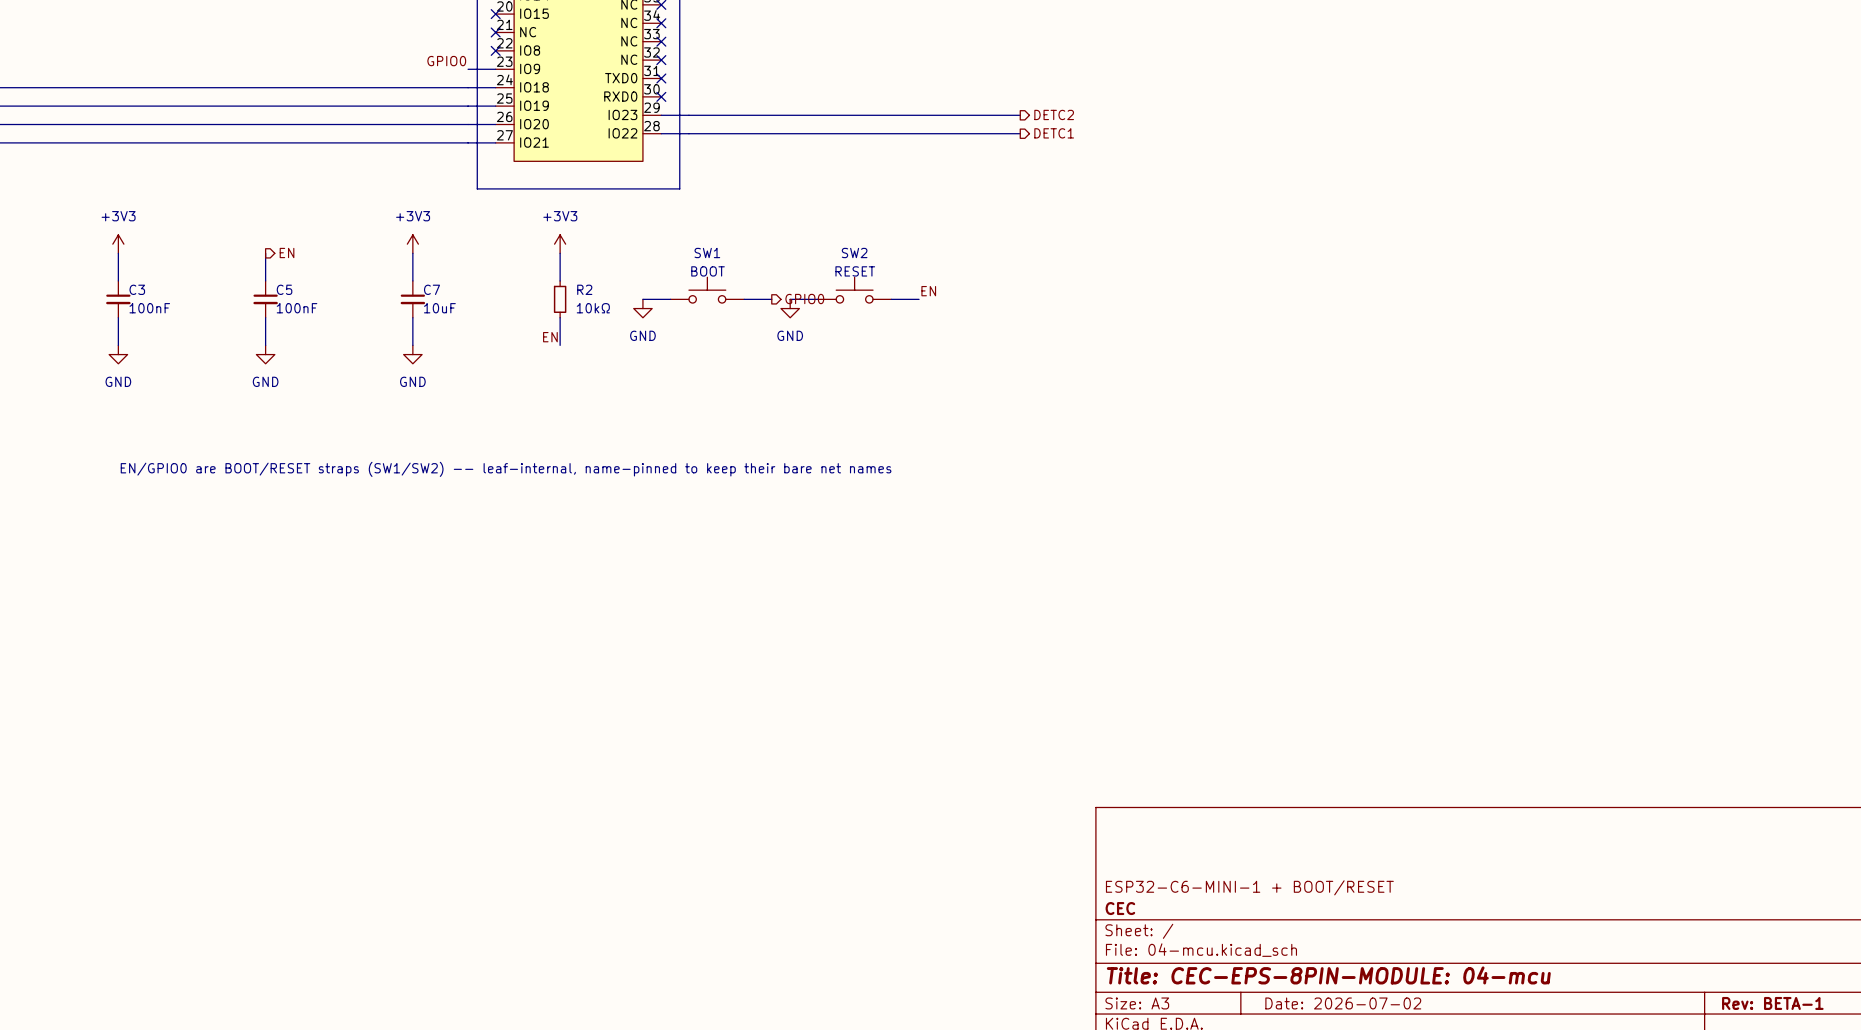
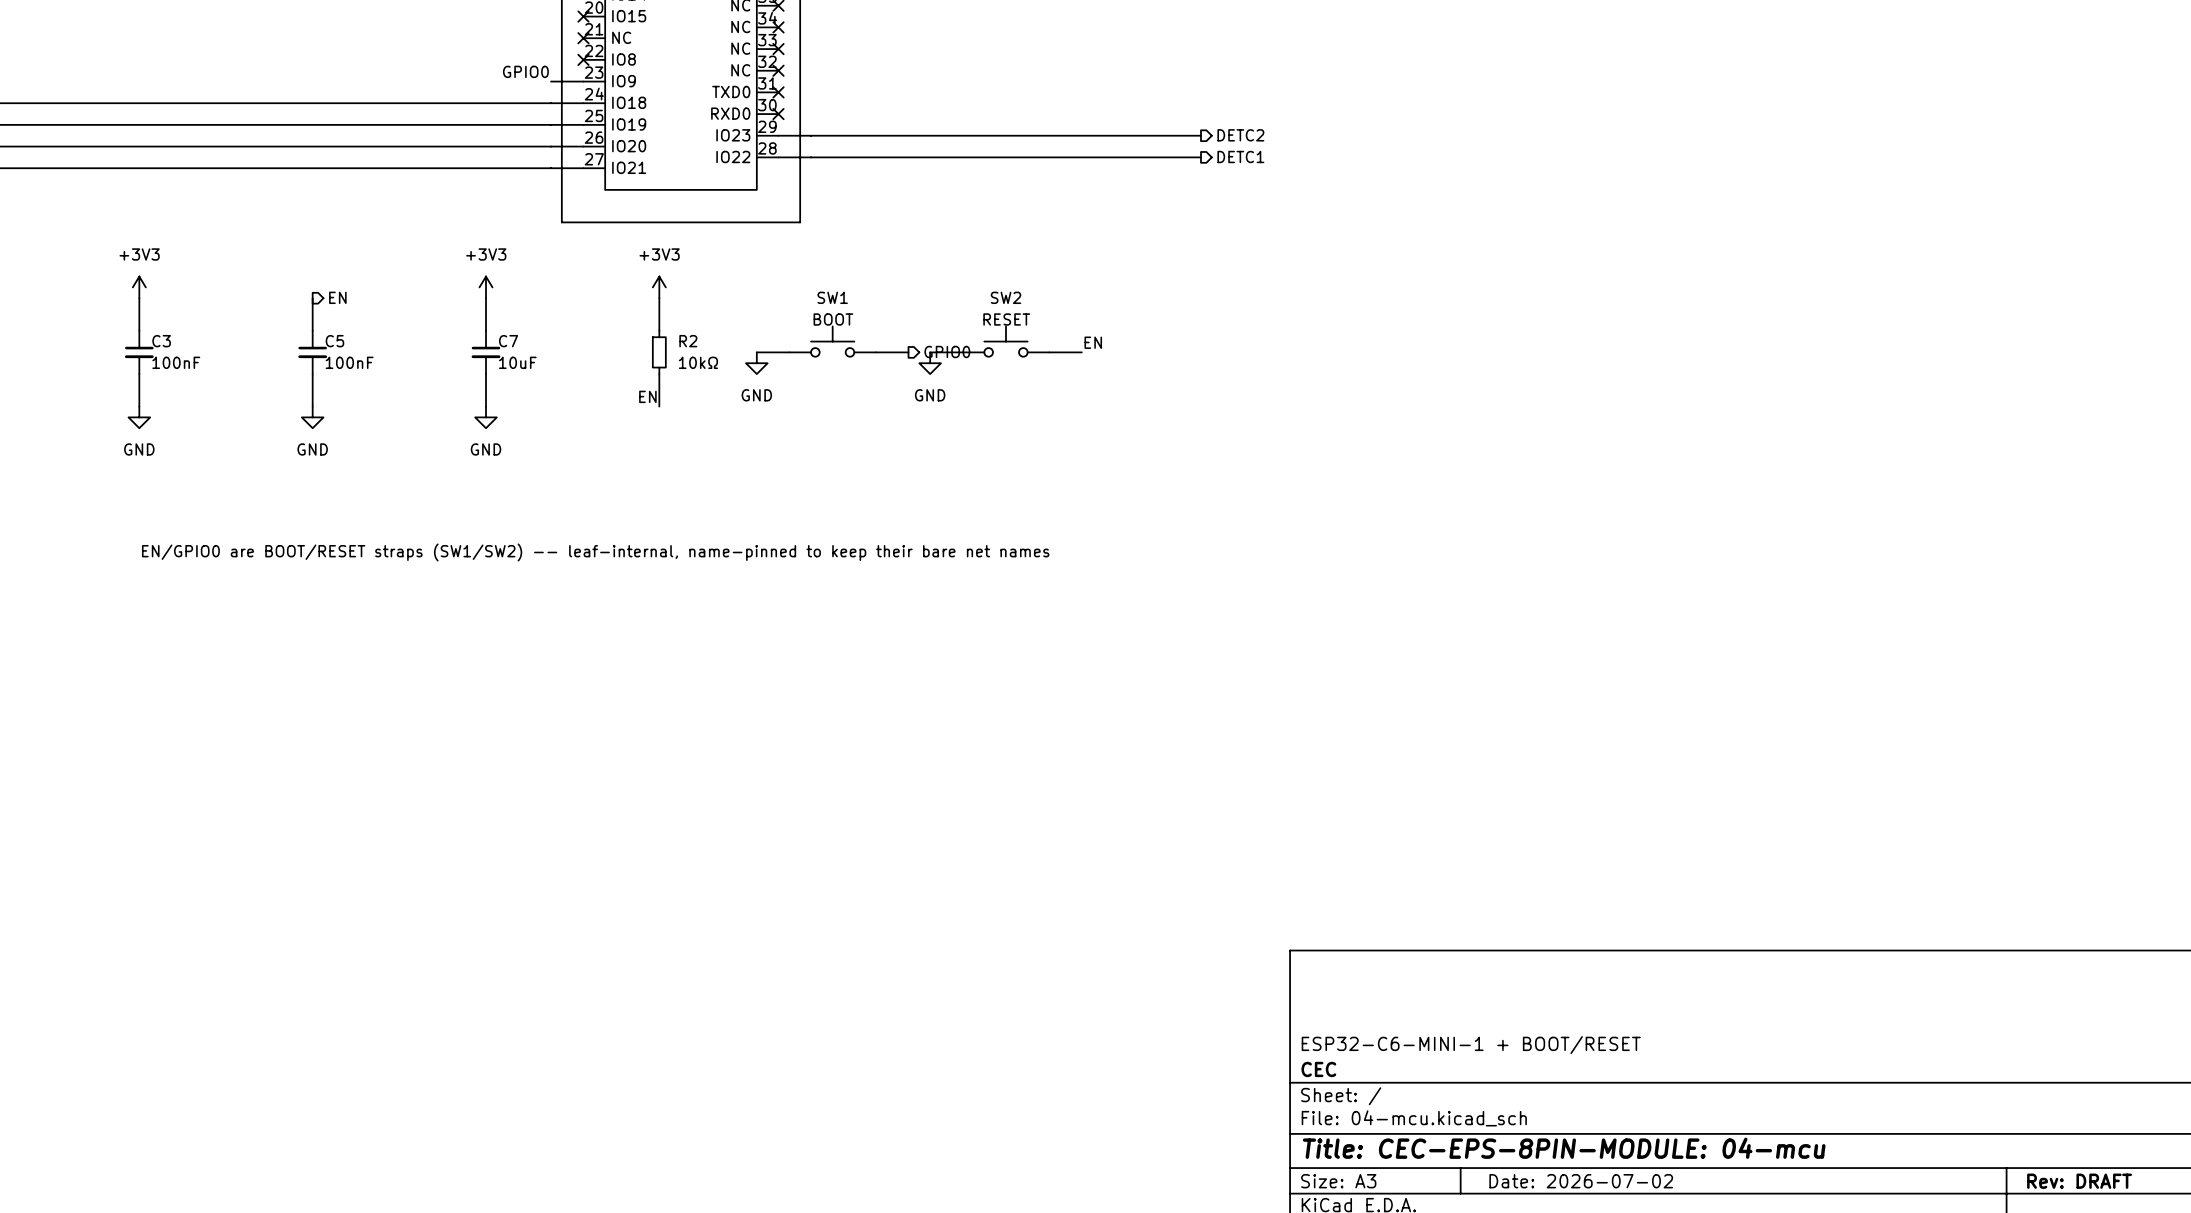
title block: Rev: BETA-1 (1772, 1003) -> Rev: DRAFT (2079, 1181)

